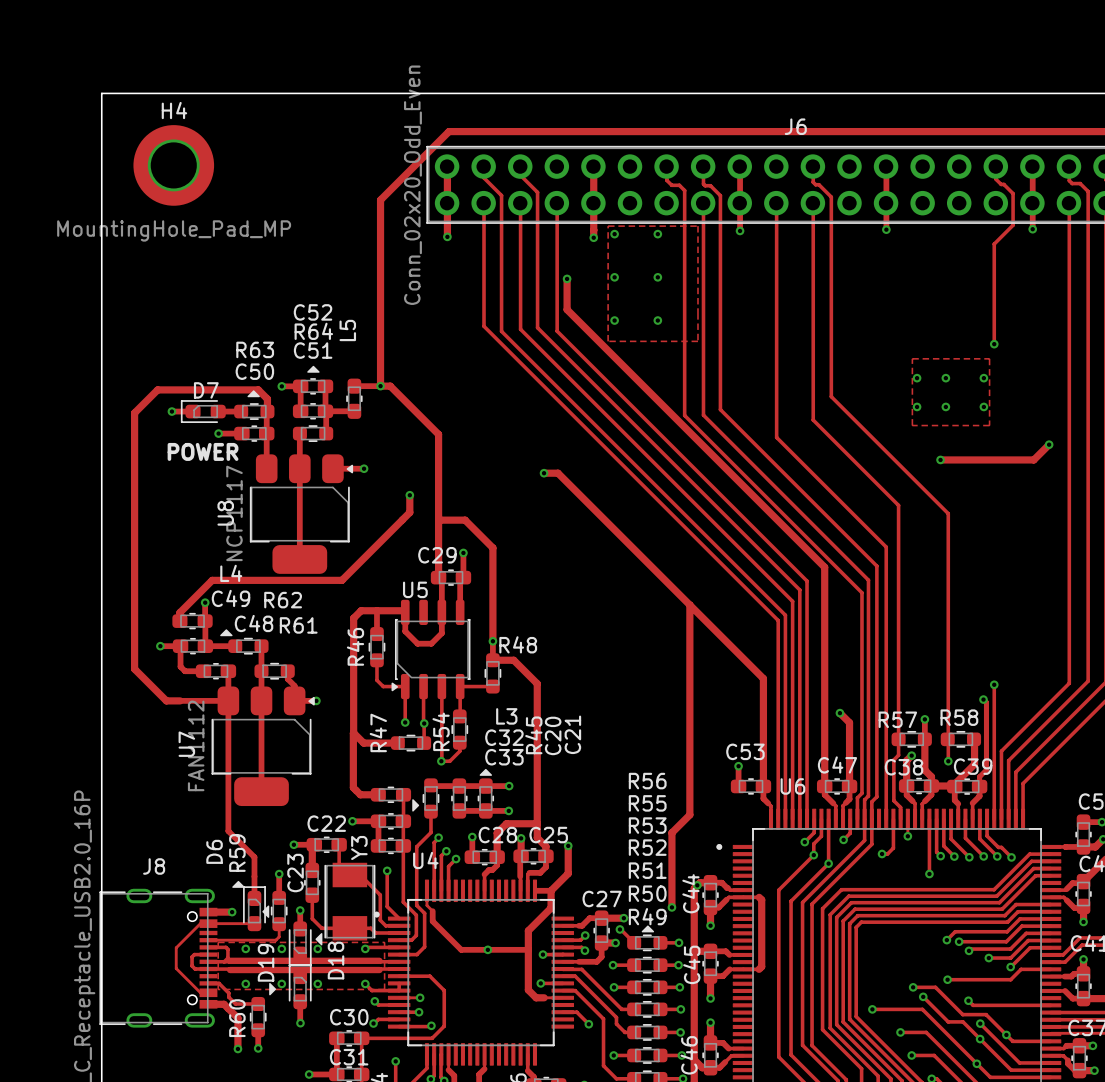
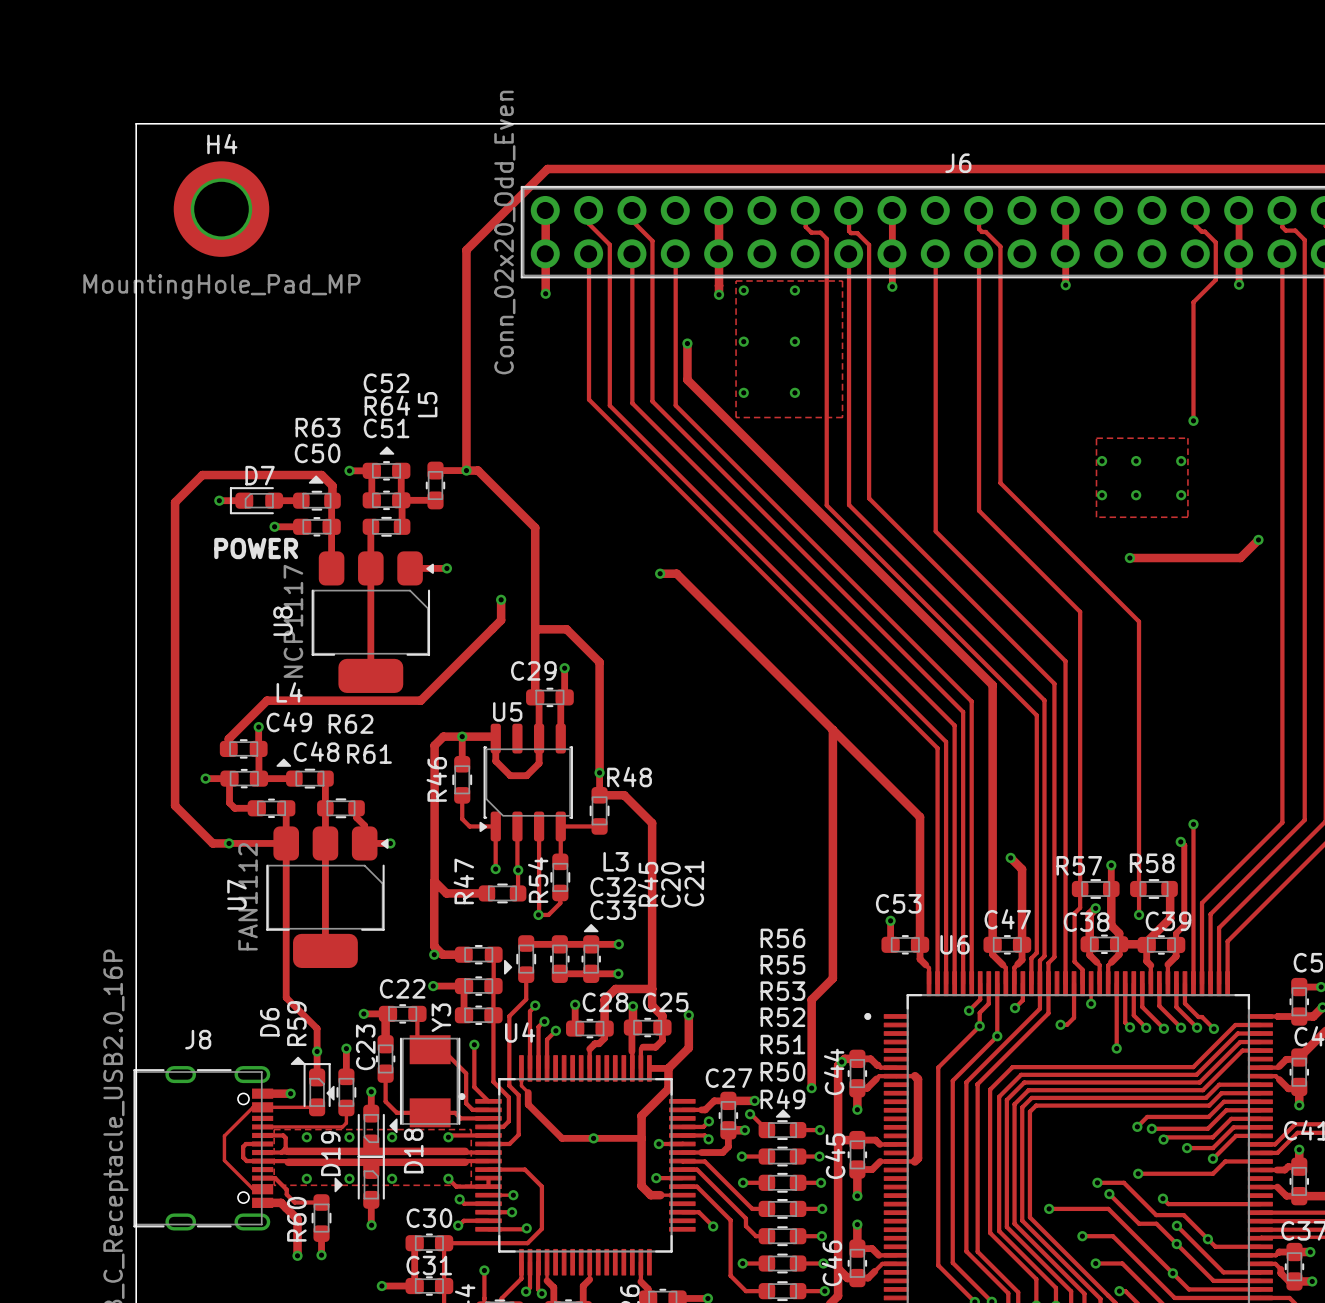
via: none -> (462, 736)
via: none -> (229, 843)
via: none -> (434, 954)
via: none -> (317, 1051)

